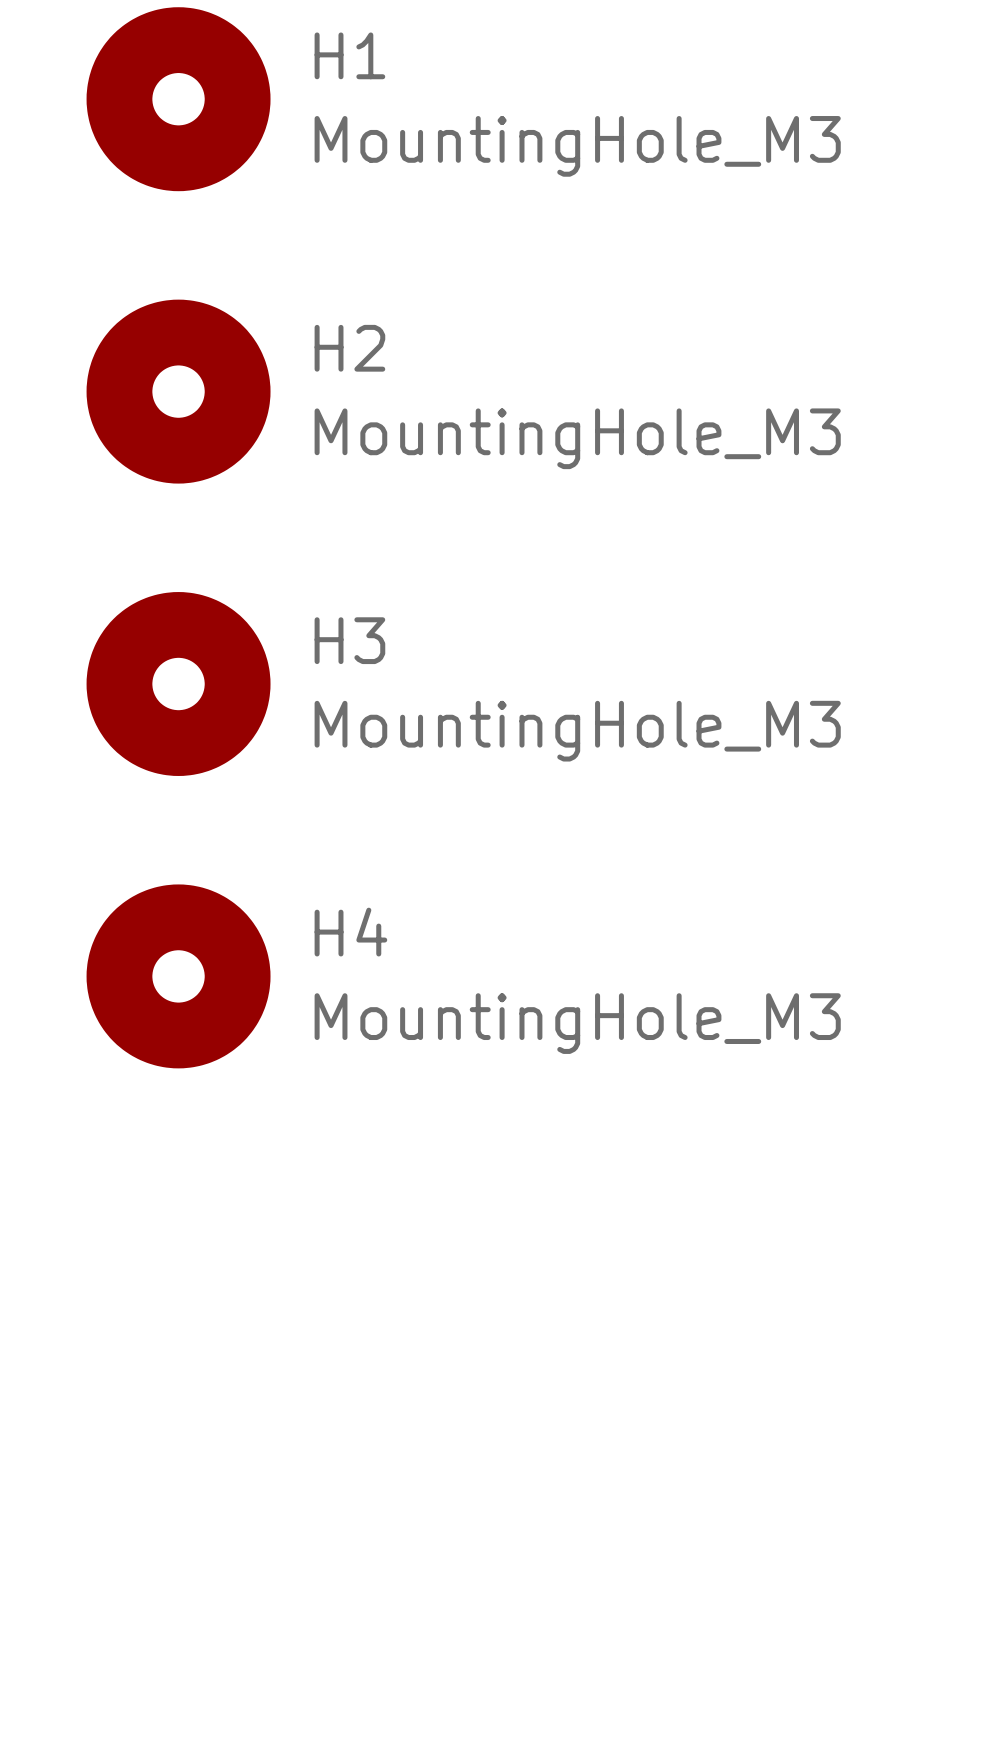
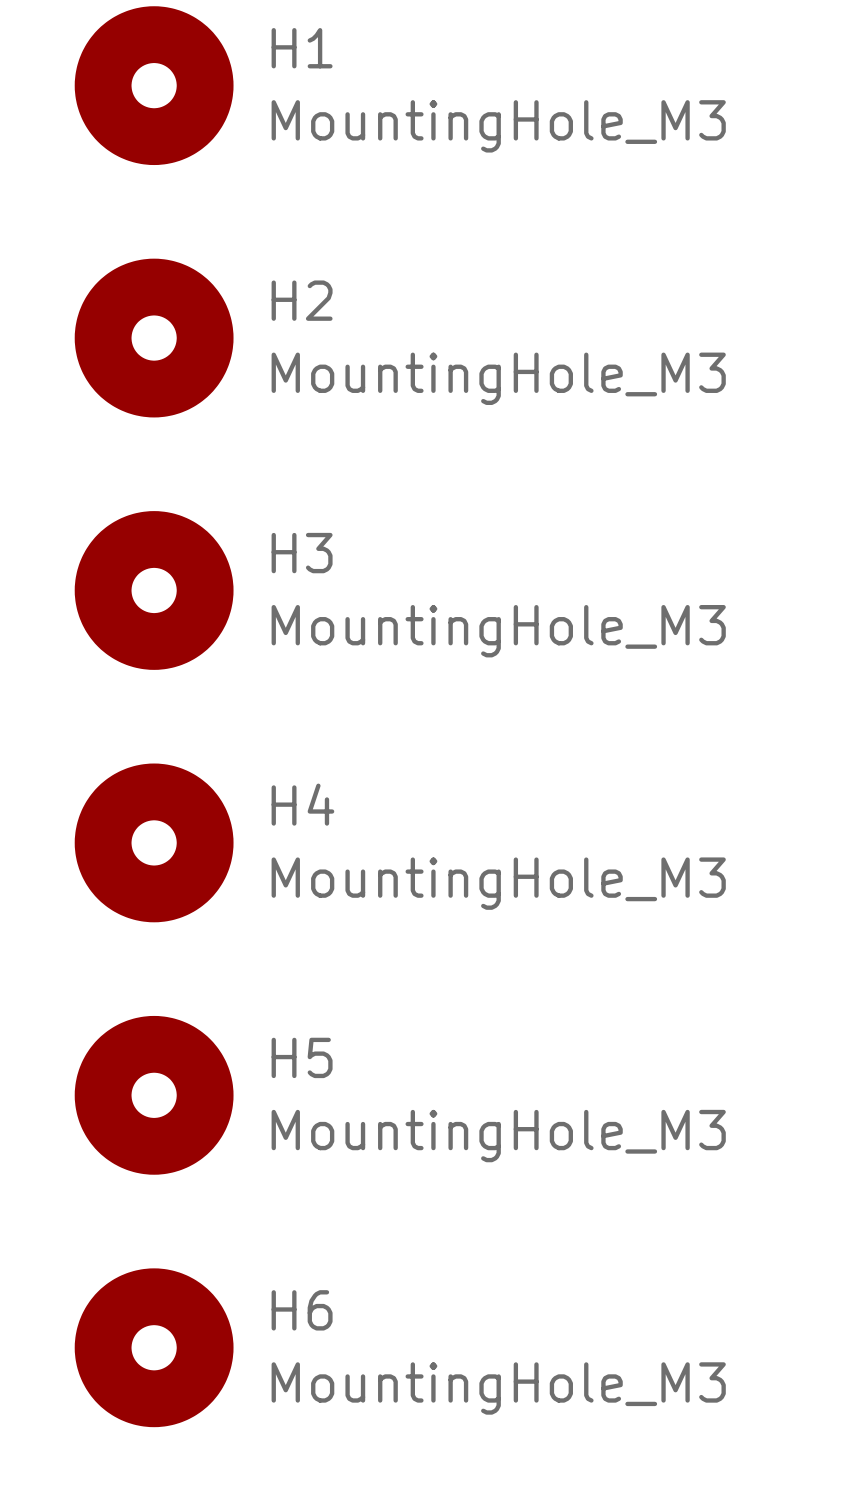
H5: none -> MountingHole_M3 (154, 1095)
H6: none -> MountingHole_M3 (154, 1347)

